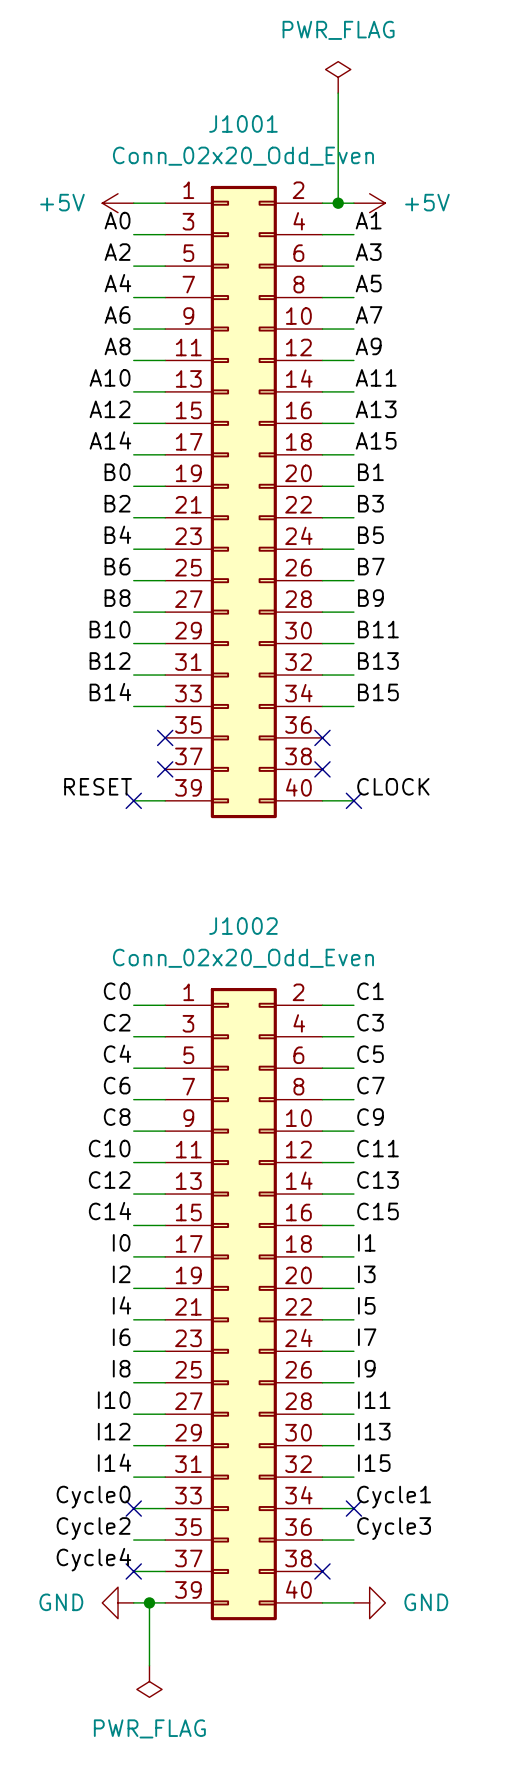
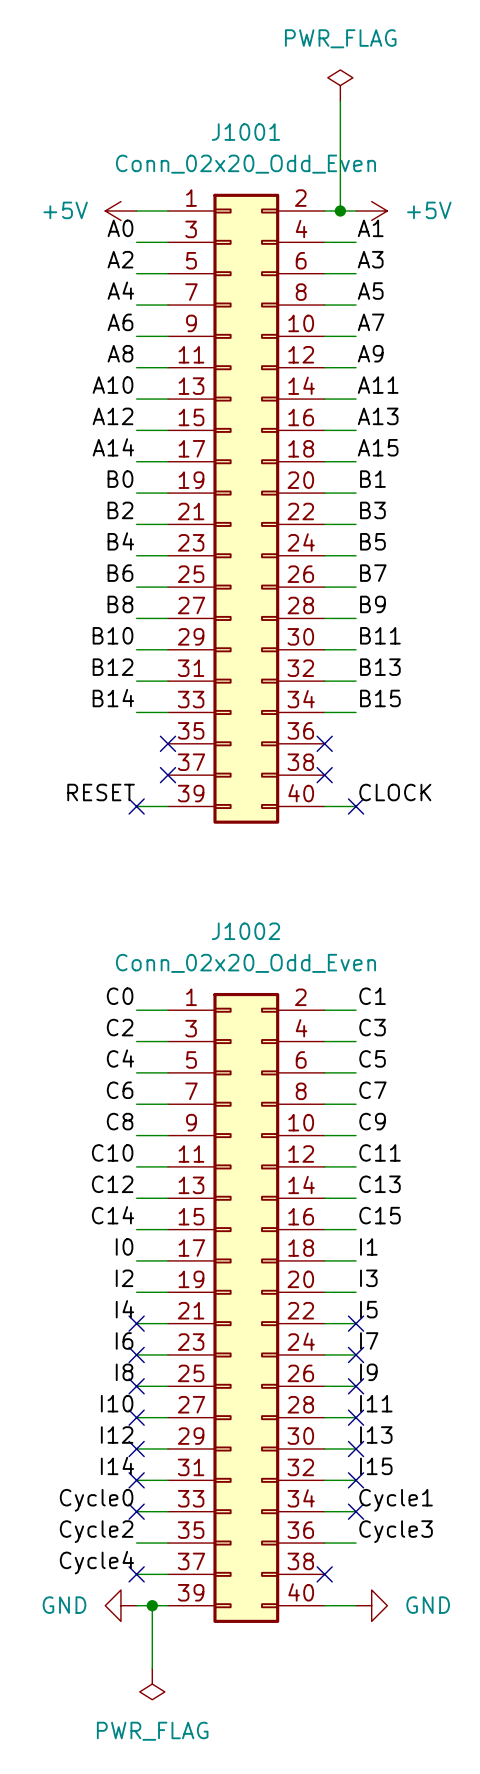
no-connect mark: none -> (136, 1323)
no-connect mark: none -> (356, 1323)
no-connect mark: none -> (136, 1354)
no-connect mark: none -> (356, 1354)
no-connect mark: none -> (136, 1386)
no-connect mark: none -> (356, 1386)
no-connect mark: none -> (136, 1417)
no-connect mark: none -> (356, 1417)
no-connect mark: none -> (136, 1449)
no-connect mark: none -> (356, 1449)
no-connect mark: none -> (136, 1480)
no-connect mark: none -> (356, 1480)

